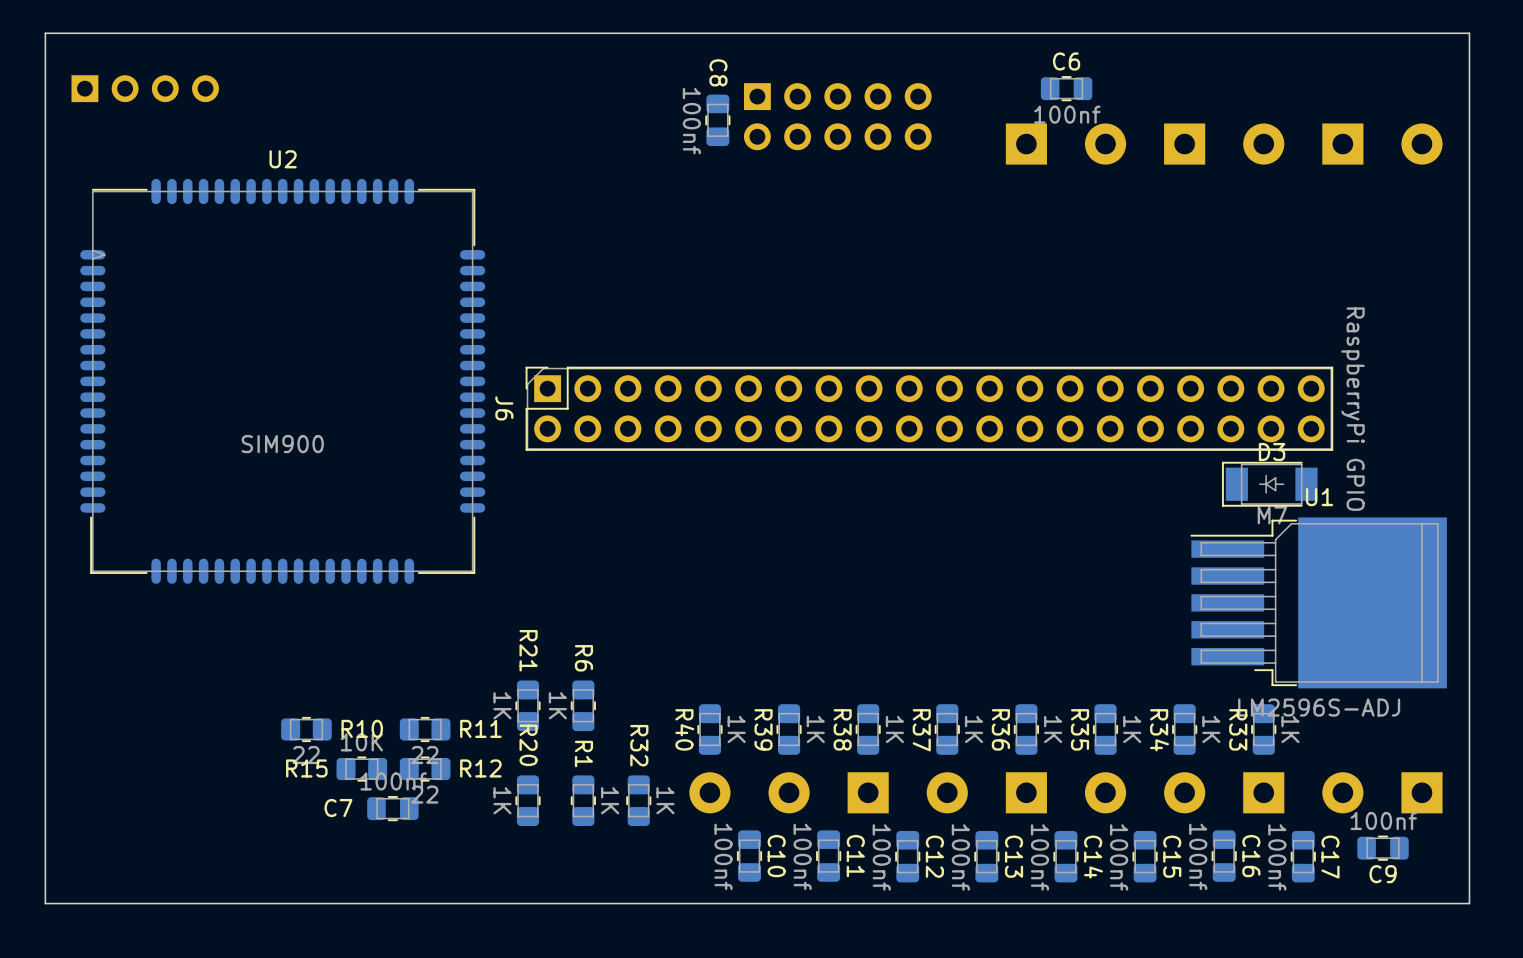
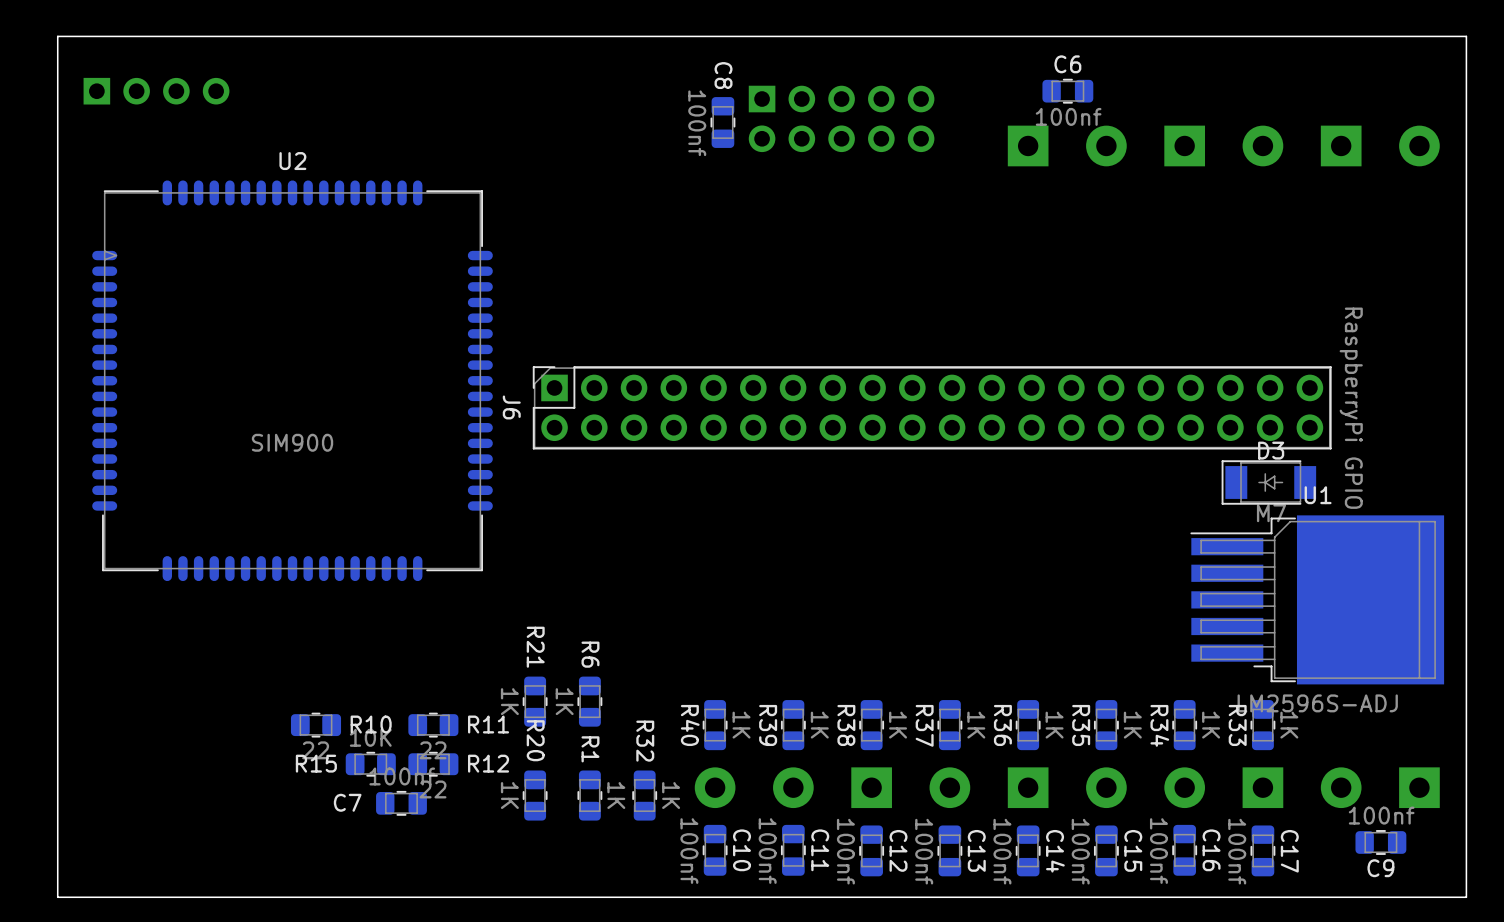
C10 position: (749, 856) -> (715, 850)
C11 position: (828, 856) -> (793, 850)
C12 position: (907, 856) -> (871, 850)
C13 position: (986, 856) -> (949, 850)
C14 position: (1065, 856) -> (1028, 850)
C15 position: (1145, 856) -> (1106, 850)
C16 position: (1224, 856) -> (1184, 850)
C17 position: (1303, 856) -> (1262, 850)

